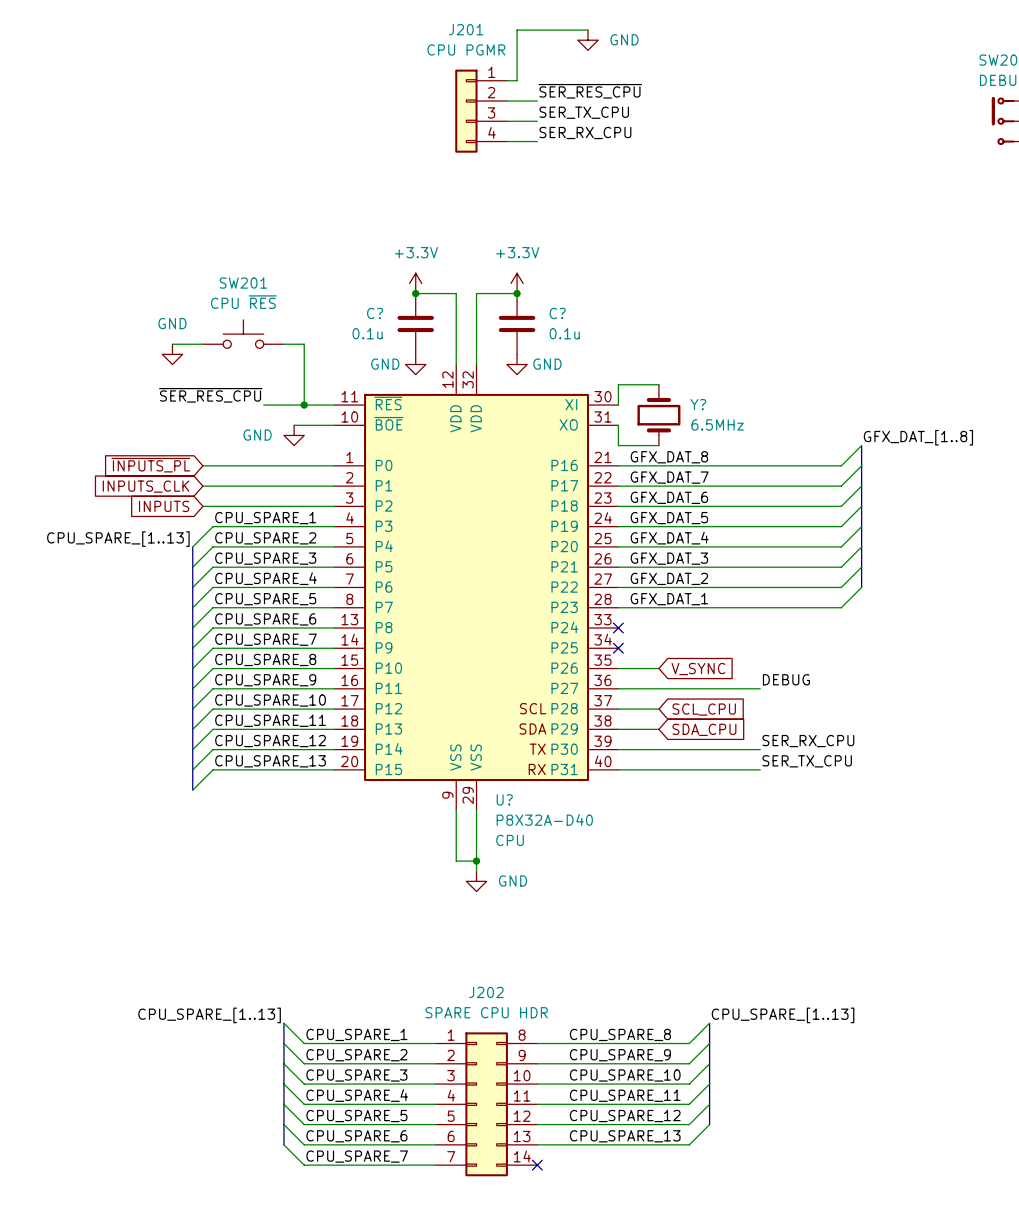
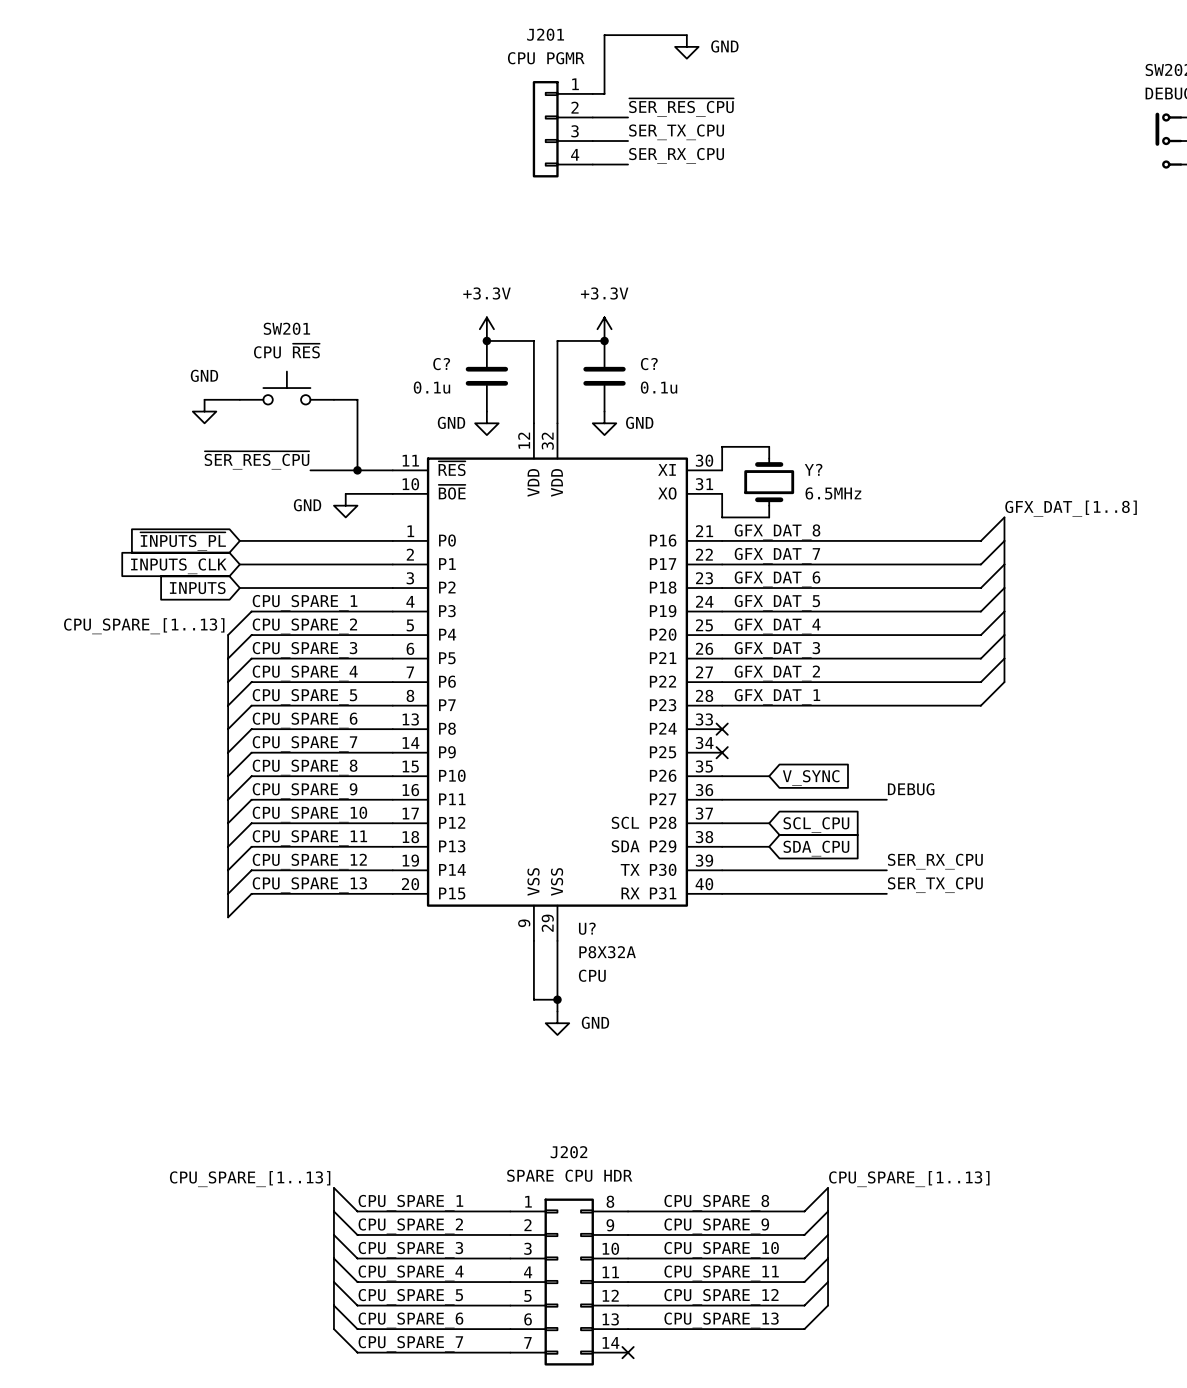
U? value: P8X32A-D40 (544, 819) -> P8X32A (607, 952)

